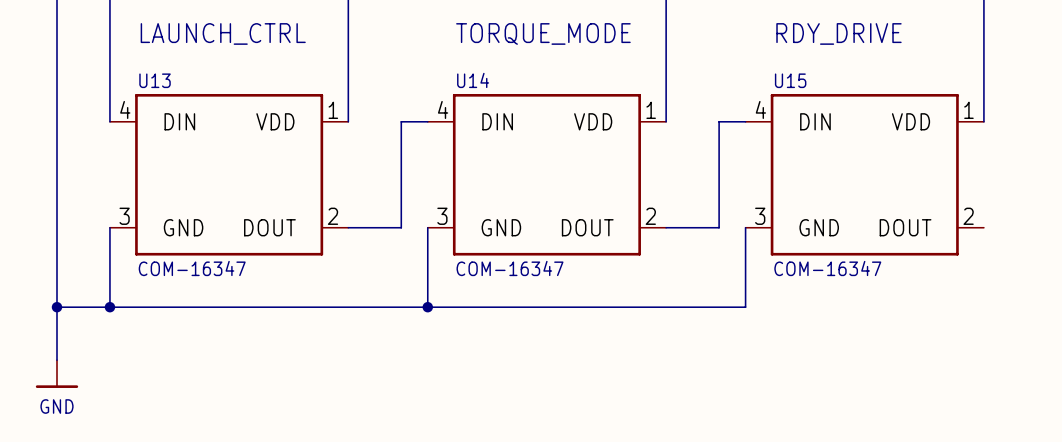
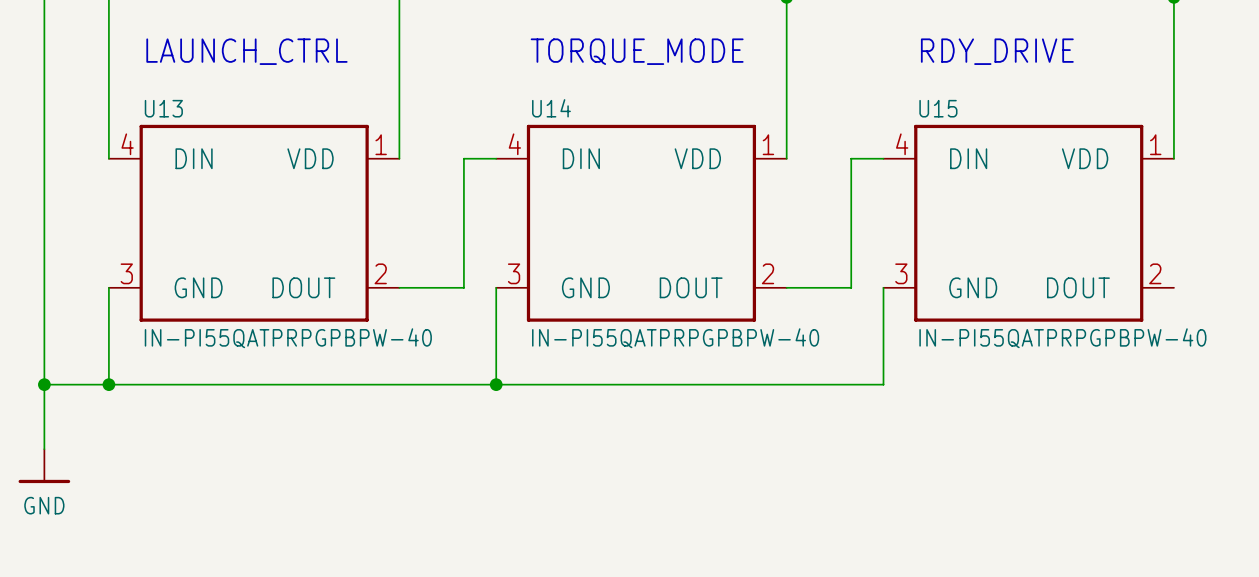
U13 text: COM-16347 (192, 268) -> IN-PI55QATPRPGPBPW-40 (288, 338)
U14 text: COM-16347 (510, 268) -> IN-PI55QATPRPGPBPW-40 (675, 338)
U15 text: COM-16347 (827, 268) -> IN-PI55QATPRPGPBPW-40 (1062, 338)

